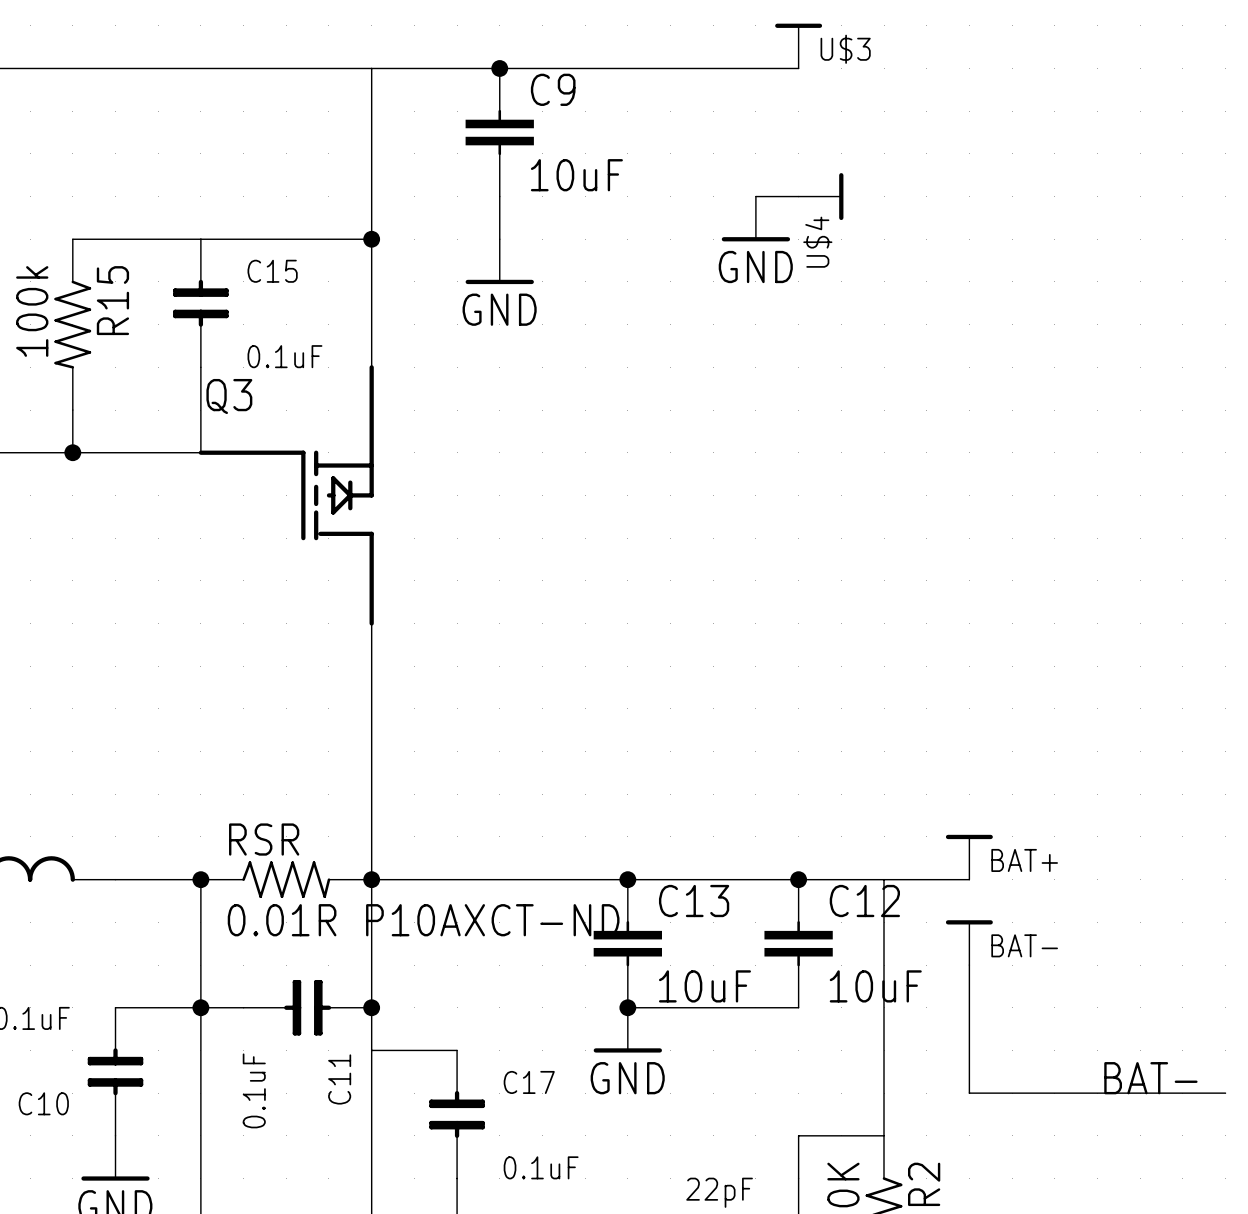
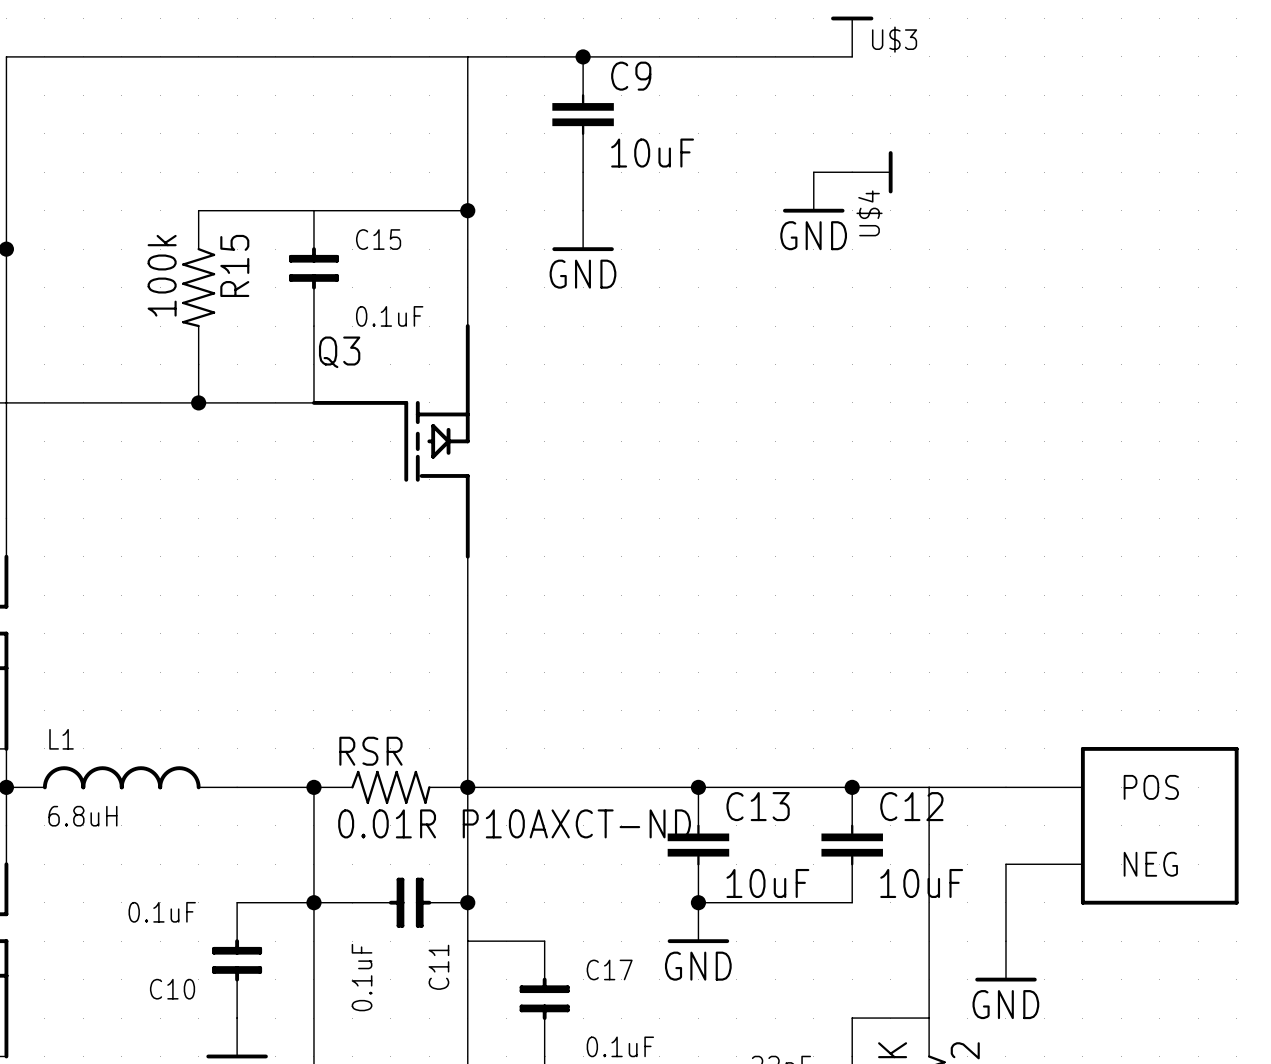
BAT+: (969, 857) -> none
part: none -> (1122, 825)
BAT-: (969, 942) -> none
wire: (969, 1050) (969, 1093) (1225, 1093) -> none
power symbol: none -> GND (1005, 961)
label: BAT- (1150, 1078) -> none

